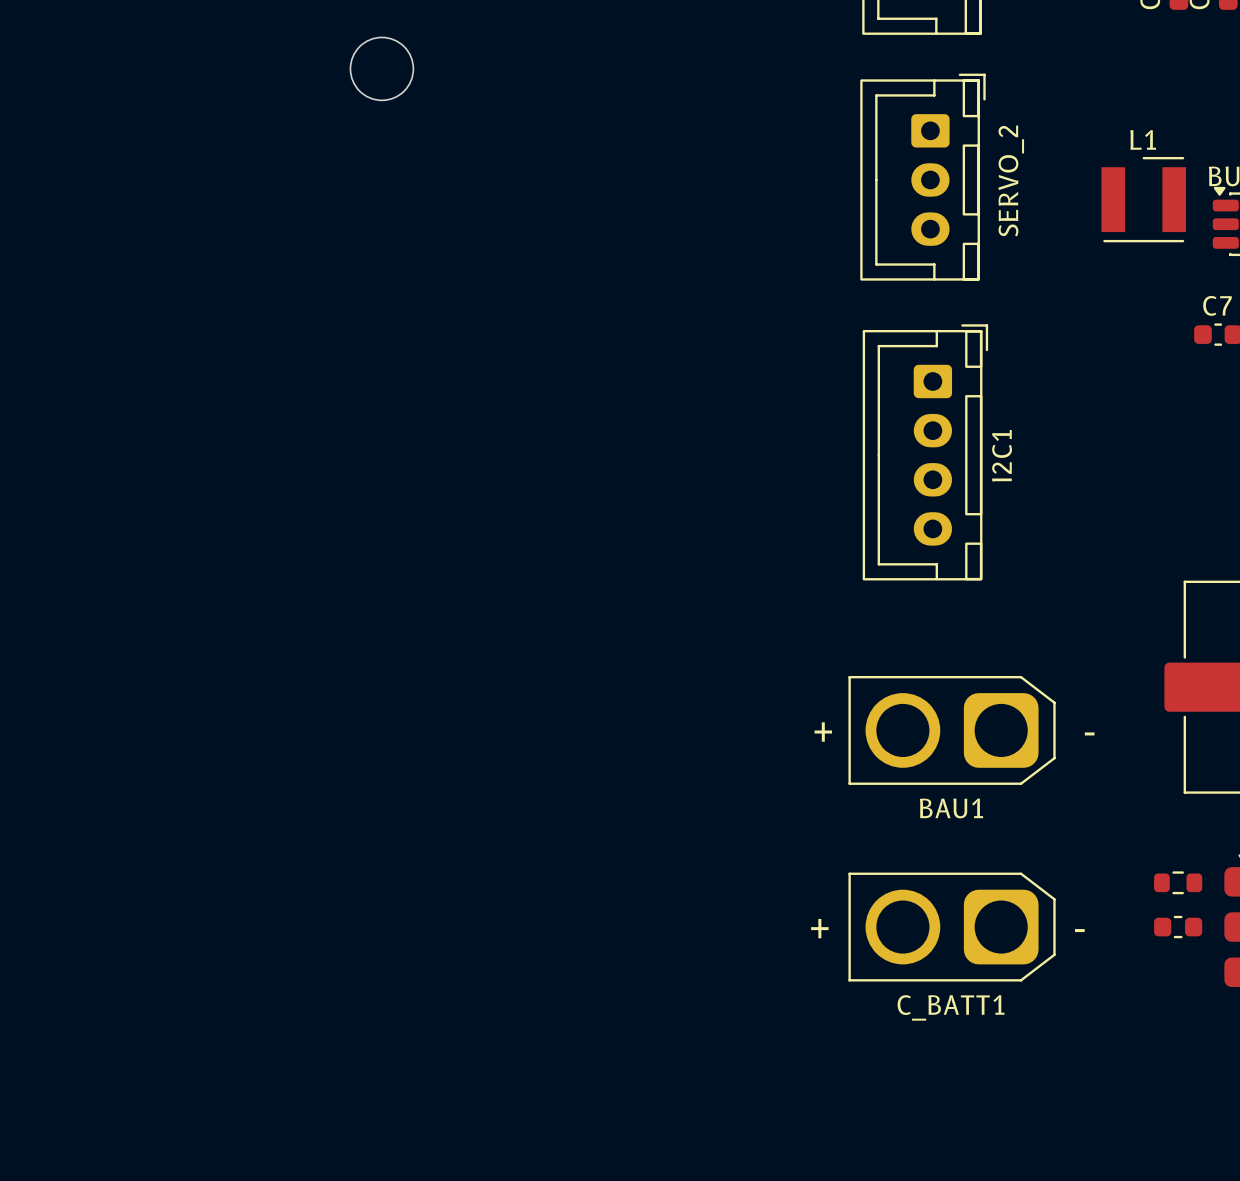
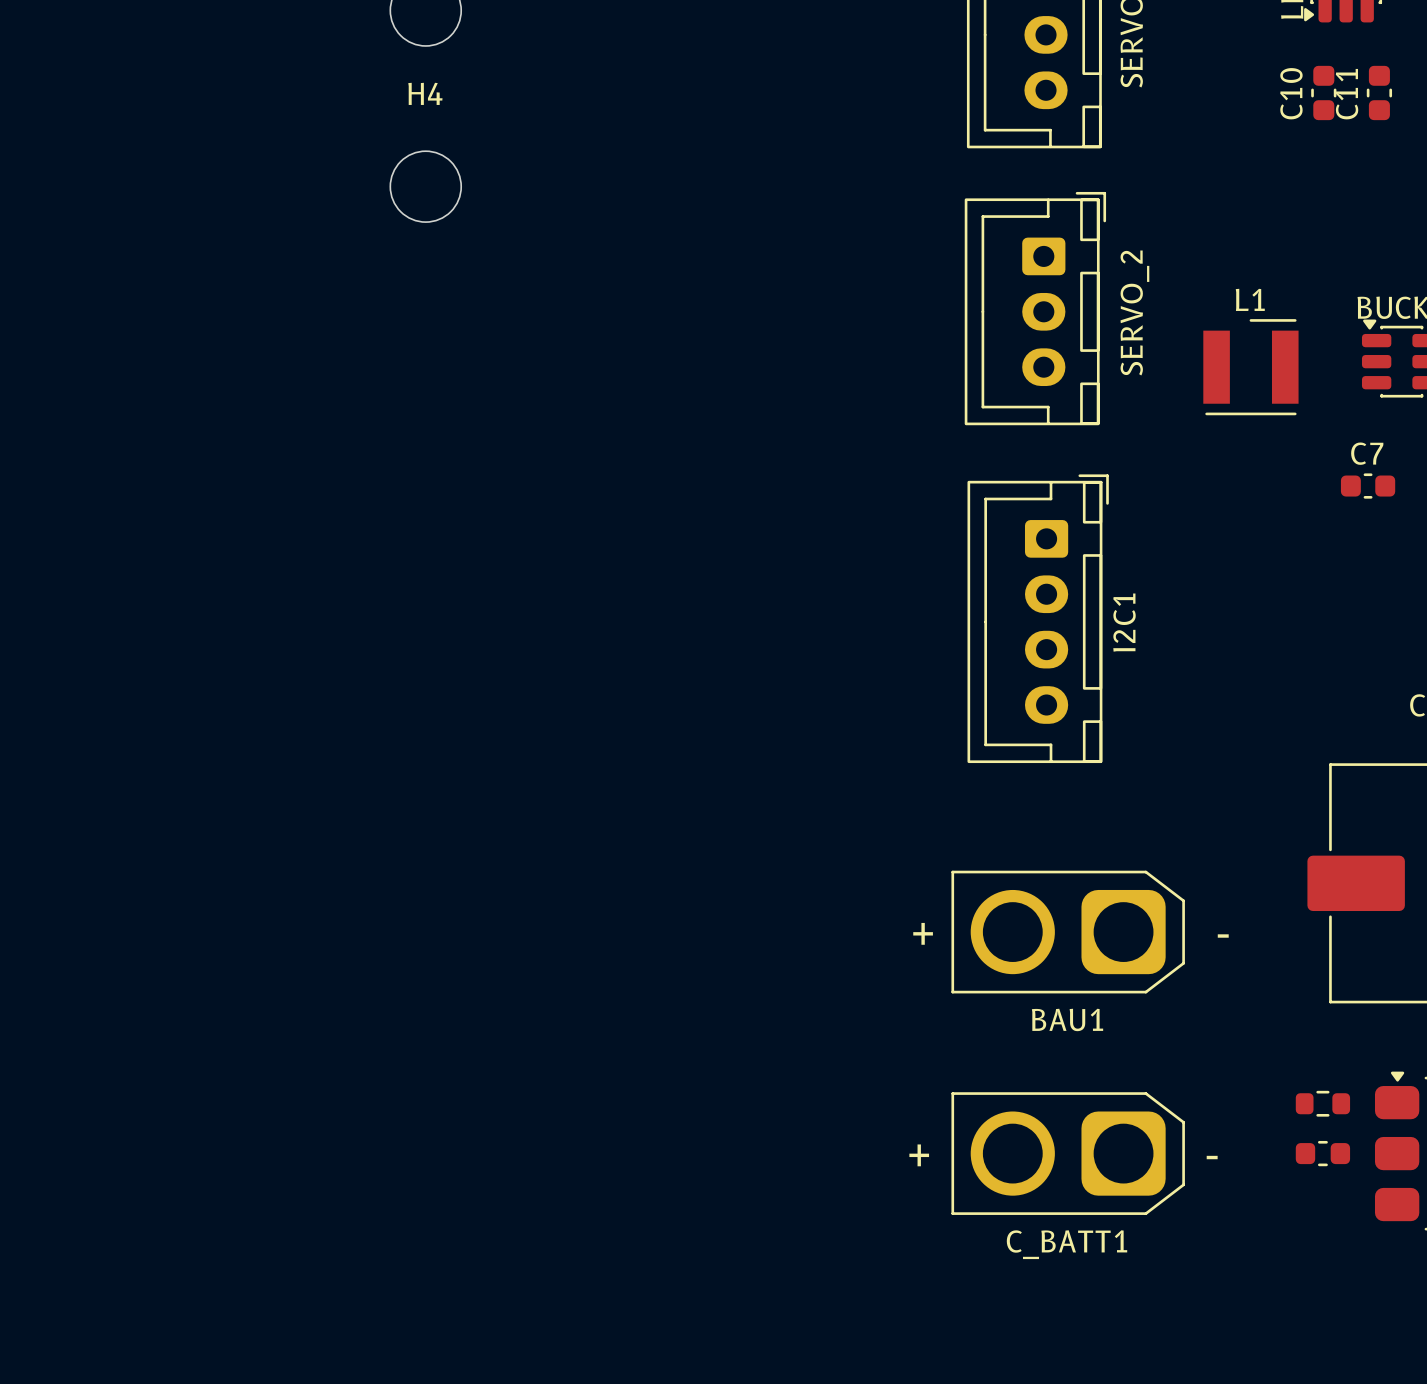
L1 position: (1143, 199) -> (1250, 367)

